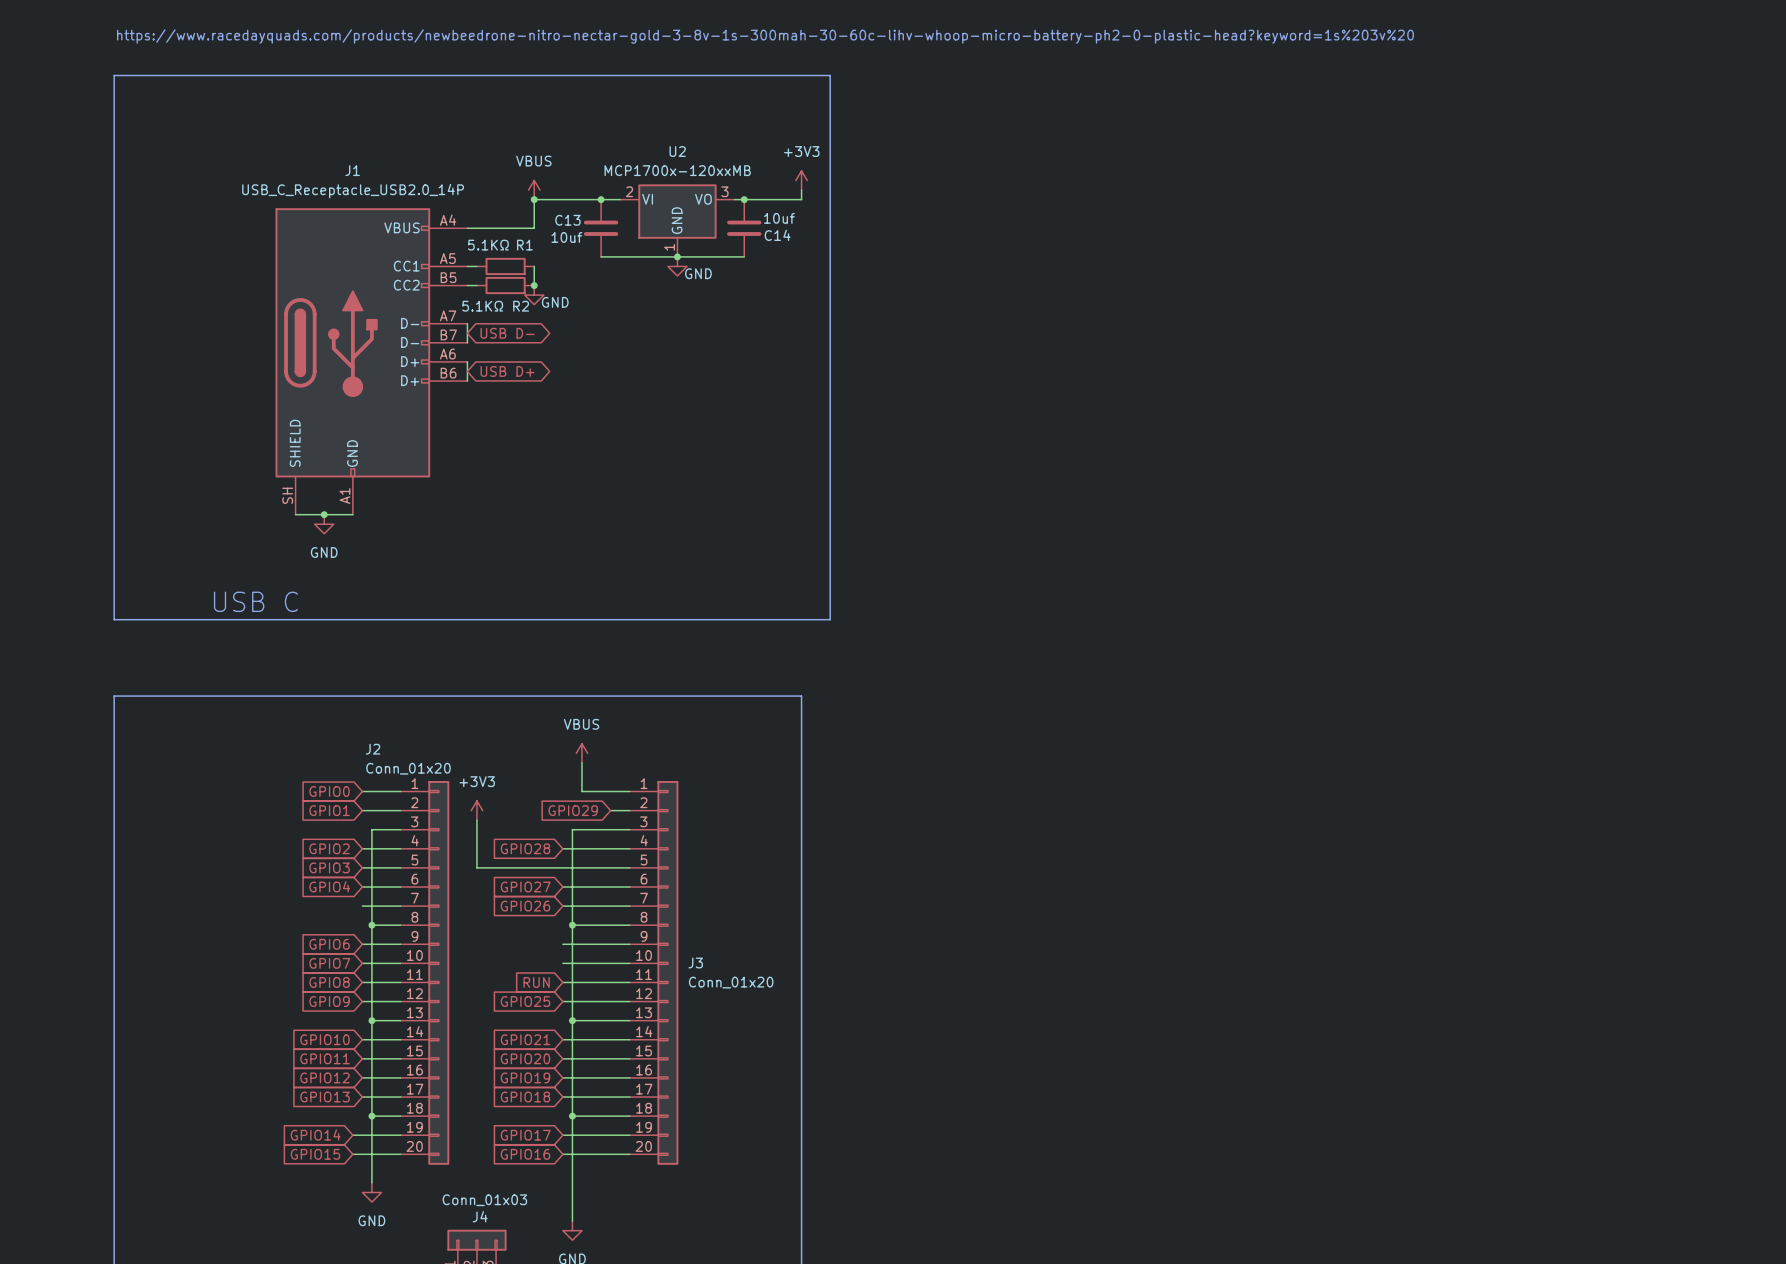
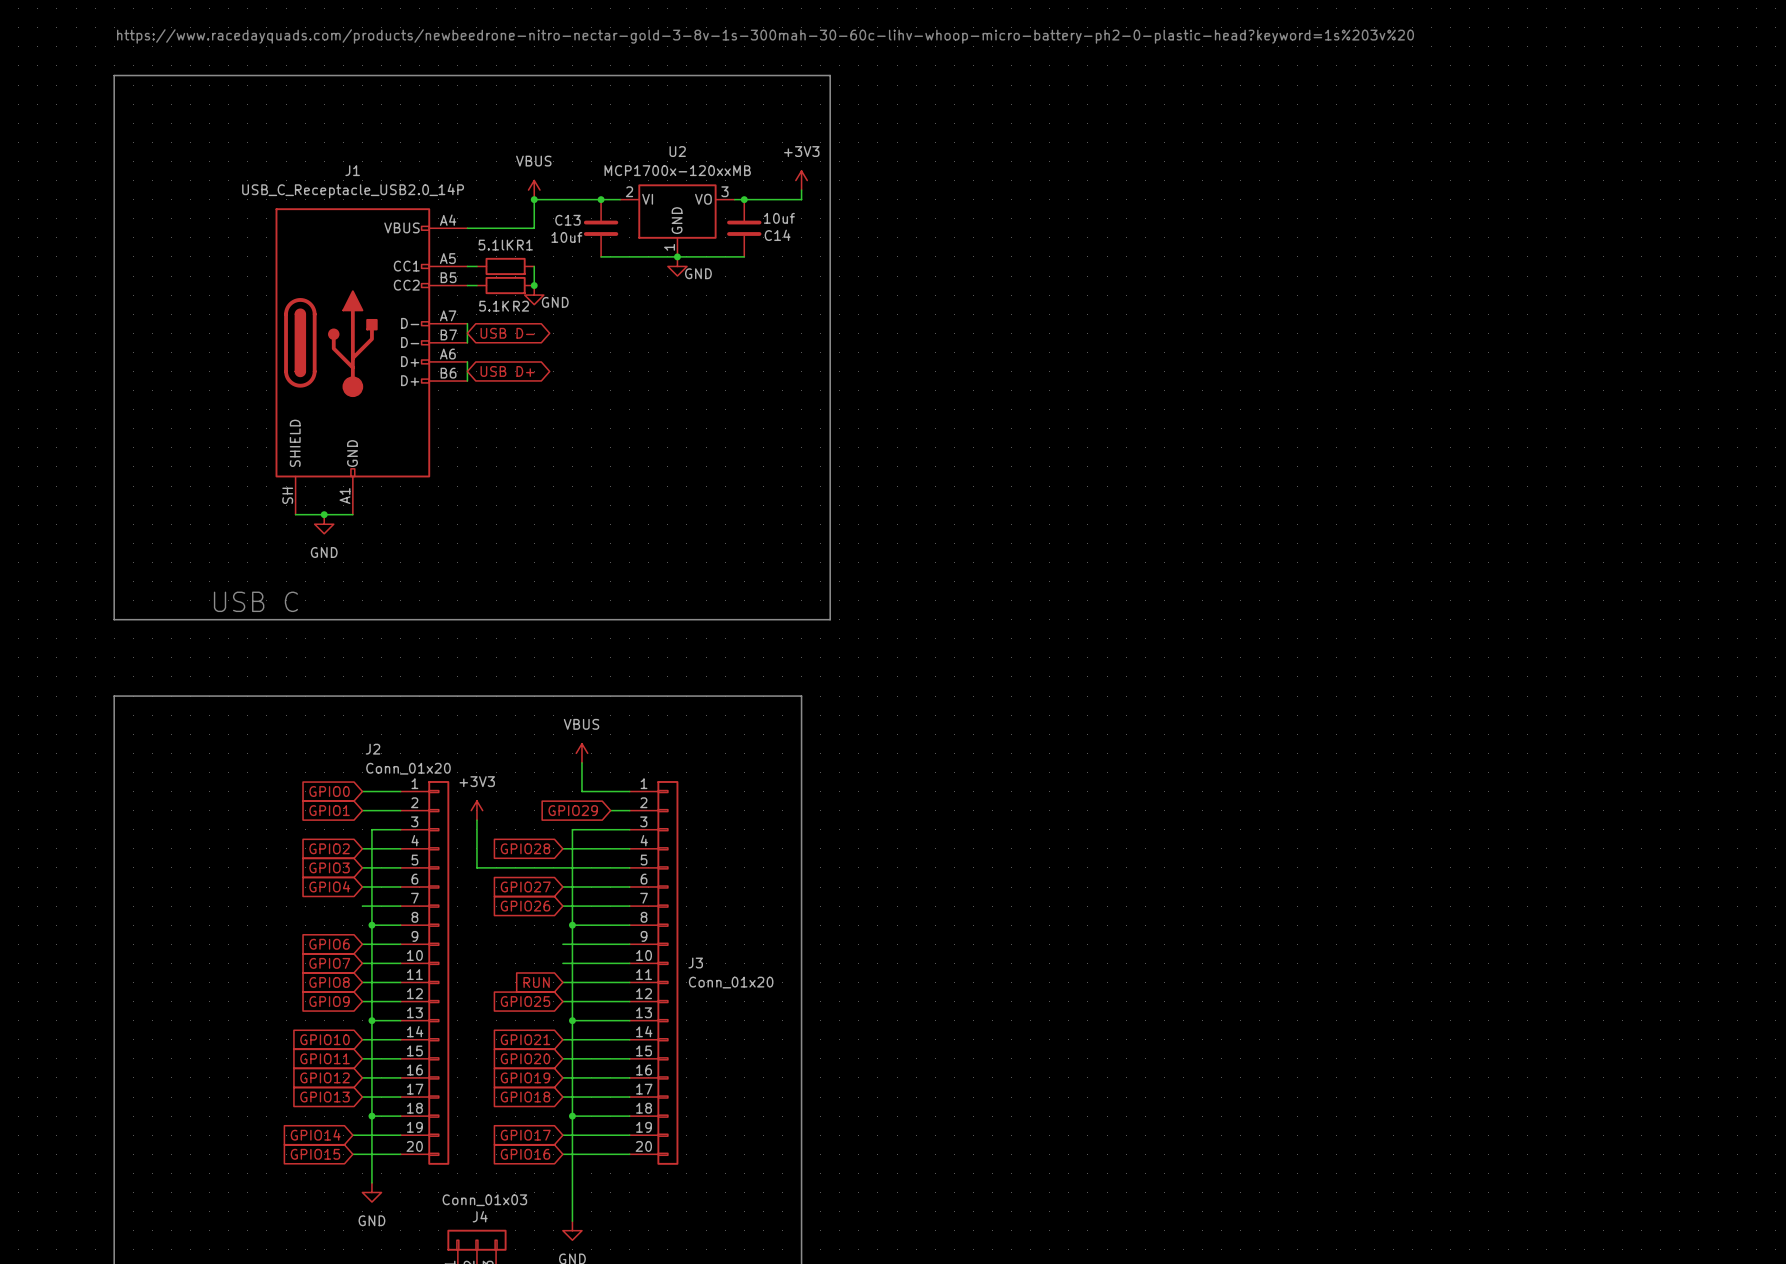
R1 value: 5.1KΩ (488, 245) -> 5.1lK (496, 245)
R2 value: 5.1KΩ (482, 306) -> 5.1K (494, 306)

